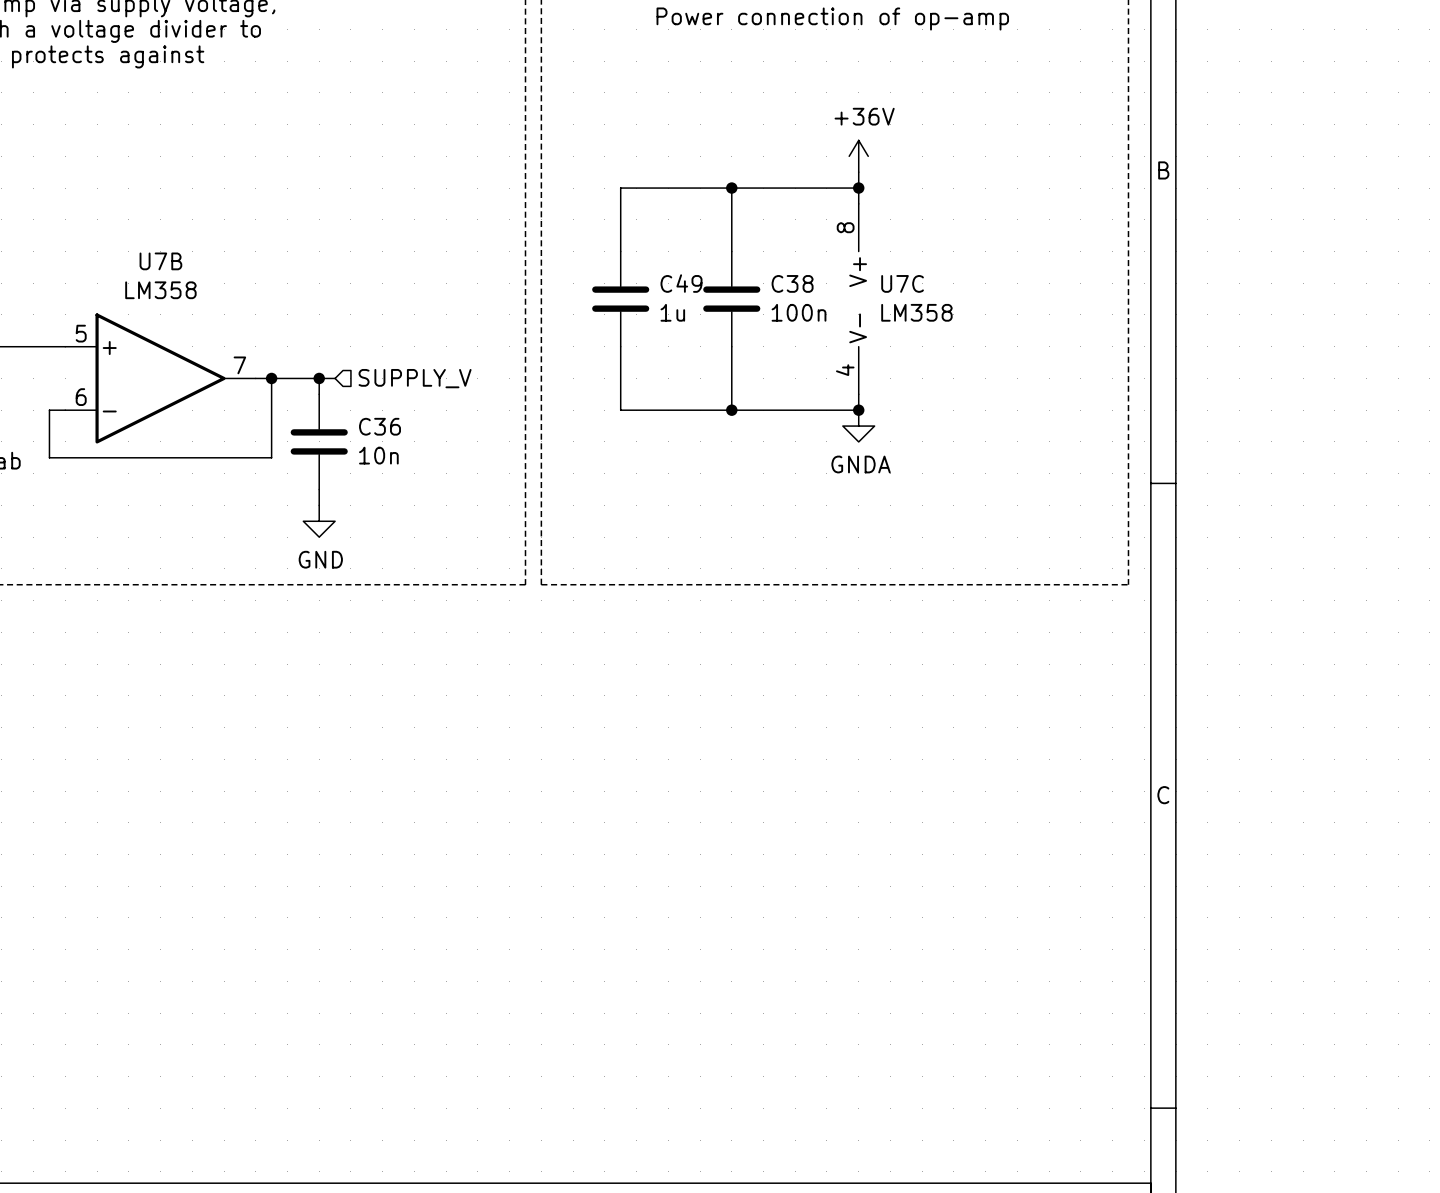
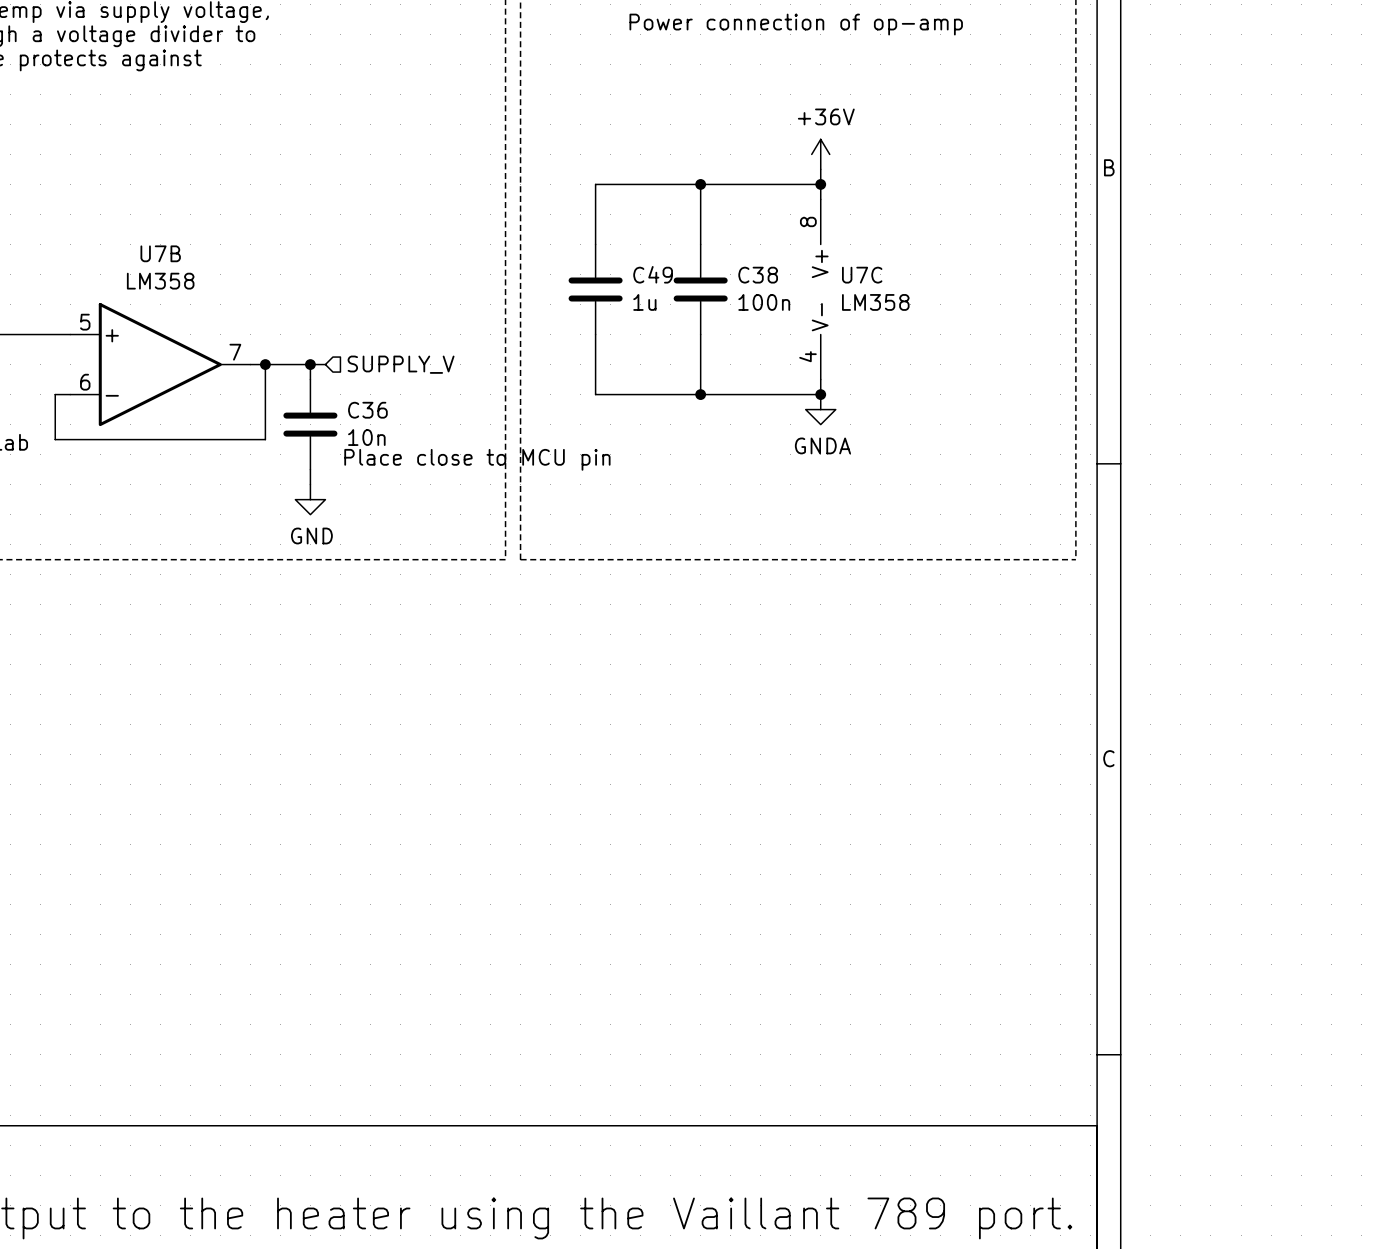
text: none -> Place close to MCU pin (477, 459)

